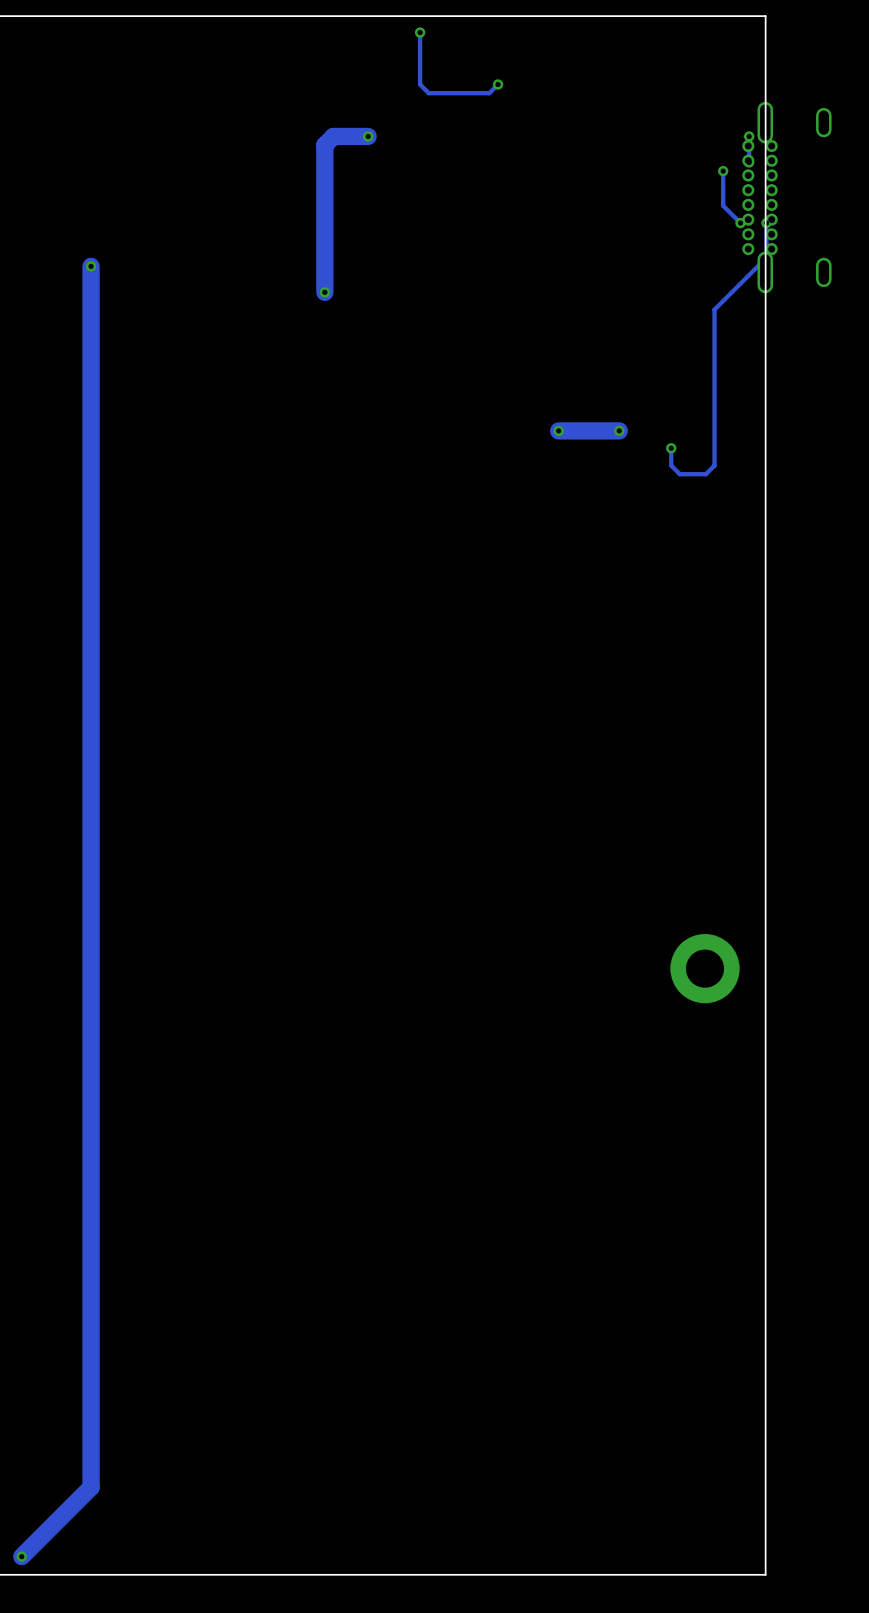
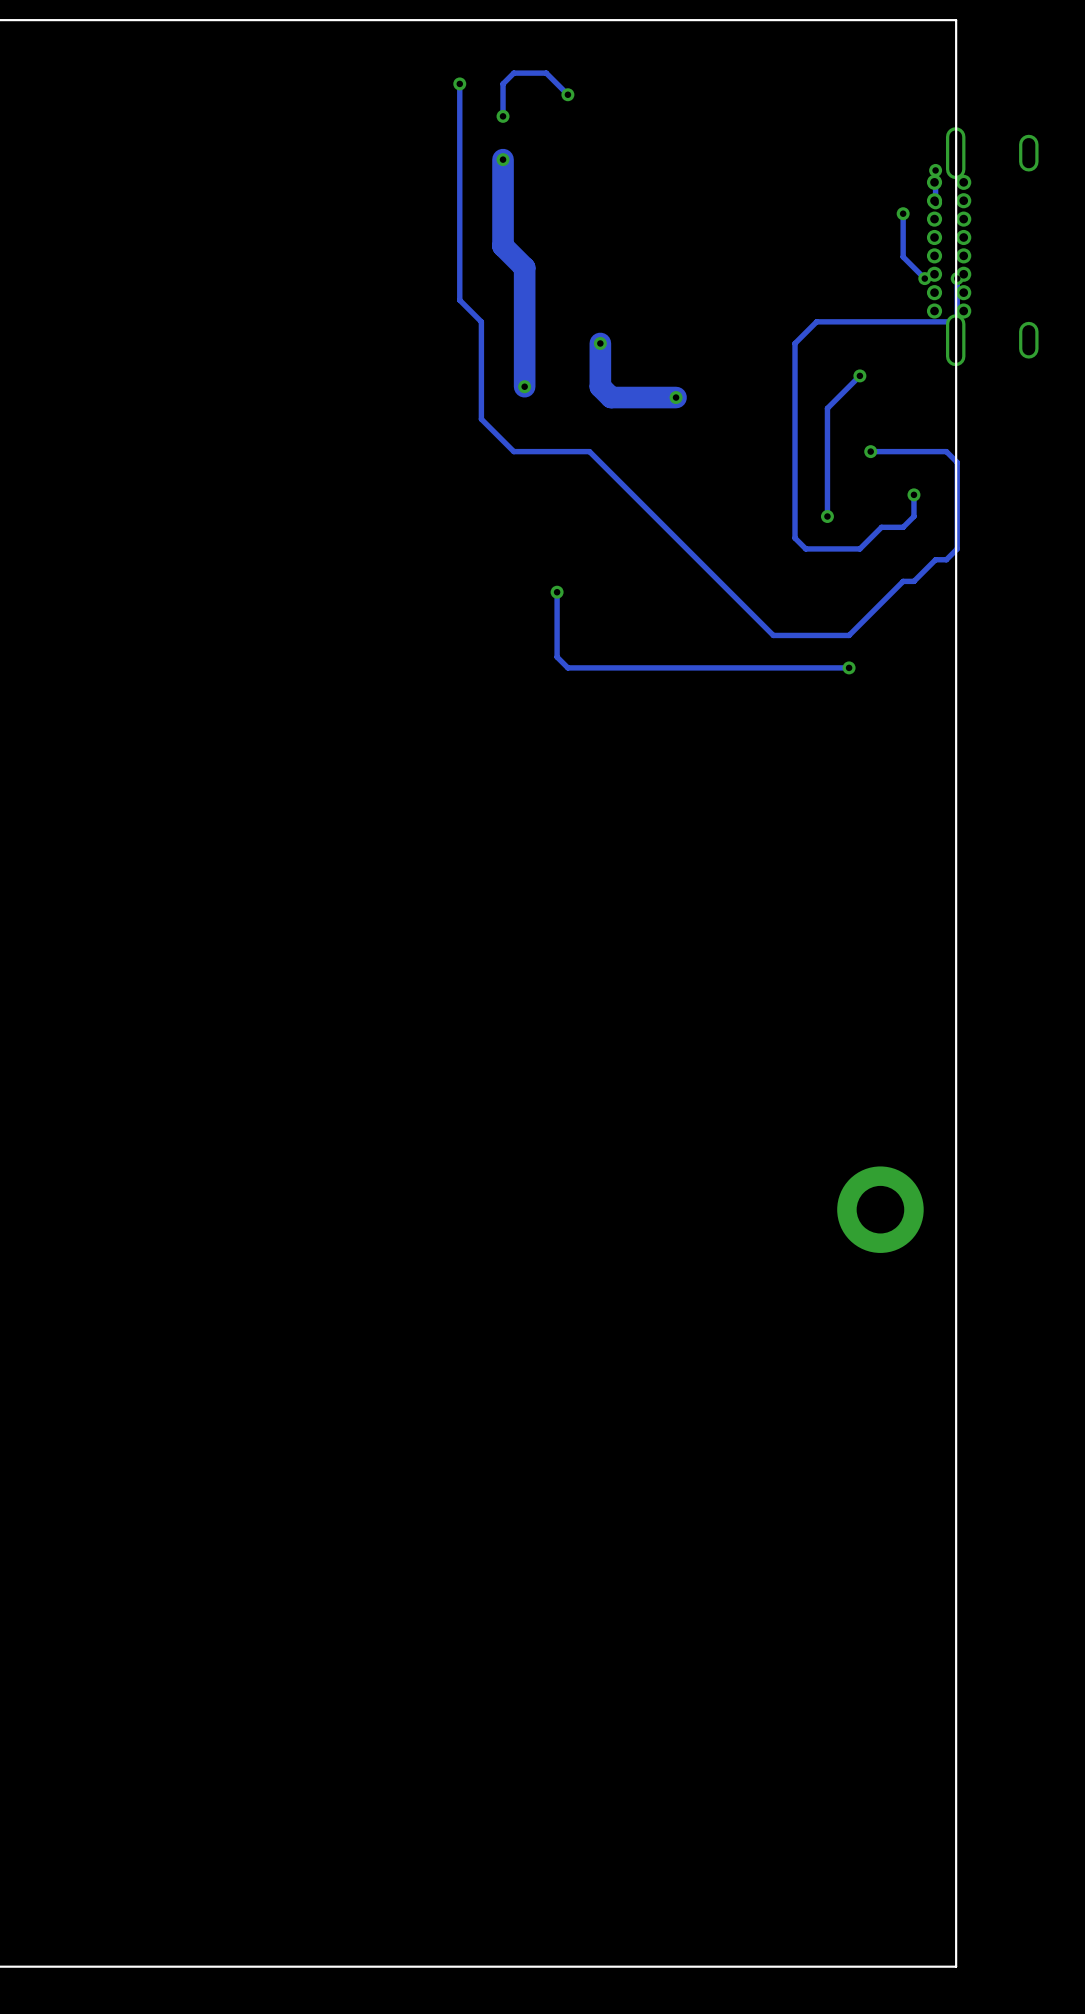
track: (420, 32) (420, 84) (428, 93) (489, 93) (498, 84) -> none
via: (420, 32) -> none
track: none -> (459, 83) (459, 300) (481, 321) (481, 419) (513, 451) (589, 451) (773, 635) (849, 635) (903, 581) (913, 581) (935, 559) (946, 559) (957, 548) (957, 462) (946, 451) (870, 451)
via: none -> (459, 83)
track: none -> (567, 94) (546, 73) (513, 73) (503, 83) (503, 116)
via: none -> (567, 94)
via: (498, 84) -> none
via: none -> (503, 116)
track: none -> (503, 159) (503, 246) (524, 267) (524, 386)
via: none -> (503, 159)
track: (368, 136) (333, 136) (324, 145) (324, 292) -> none
via: (368, 136) -> none
track: (766, 257) (714, 309) (714, 465) (705, 474) (679, 474) (671, 465) (671, 448) -> (957, 321) (816, 321) (795, 343) (795, 538) (805, 548) (859, 548) (881, 527) (903, 527) (913, 516) (913, 494)
track: (91, 266) (91, 1487) (21, 1556) -> none
via: (91, 266) -> none
track: none -> (600, 343) (600, 386) (611, 397) (676, 397)
via: none -> (600, 343)
via: (324, 292) -> none
track: none -> (859, 375) (827, 408) (827, 516)
via: none -> (859, 375)
via: none -> (524, 386)
via: none -> (676, 397)
via: none -> (870, 451)
via: none -> (913, 494)
via: none -> (827, 516)
via: (558, 430) -> none
track: (619, 430) (558, 430) -> none
via: (619, 430) -> none
via: (671, 448) -> none
track: none -> (557, 592) (557, 657) (567, 667) (849, 667)
via: none -> (557, 592)
via: none -> (849, 667)
via: (21, 1556) -> none

